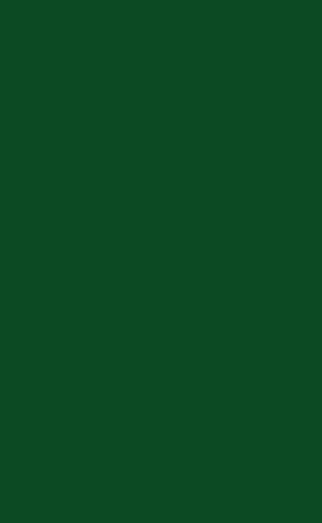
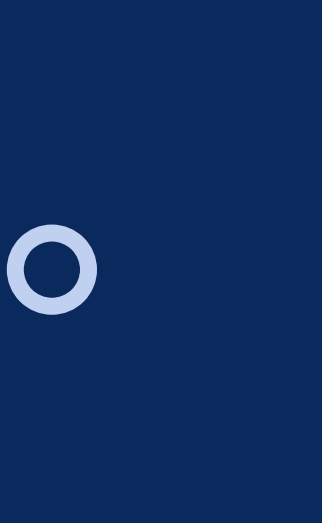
round board edge: none -> [6, 224, 97, 315]

